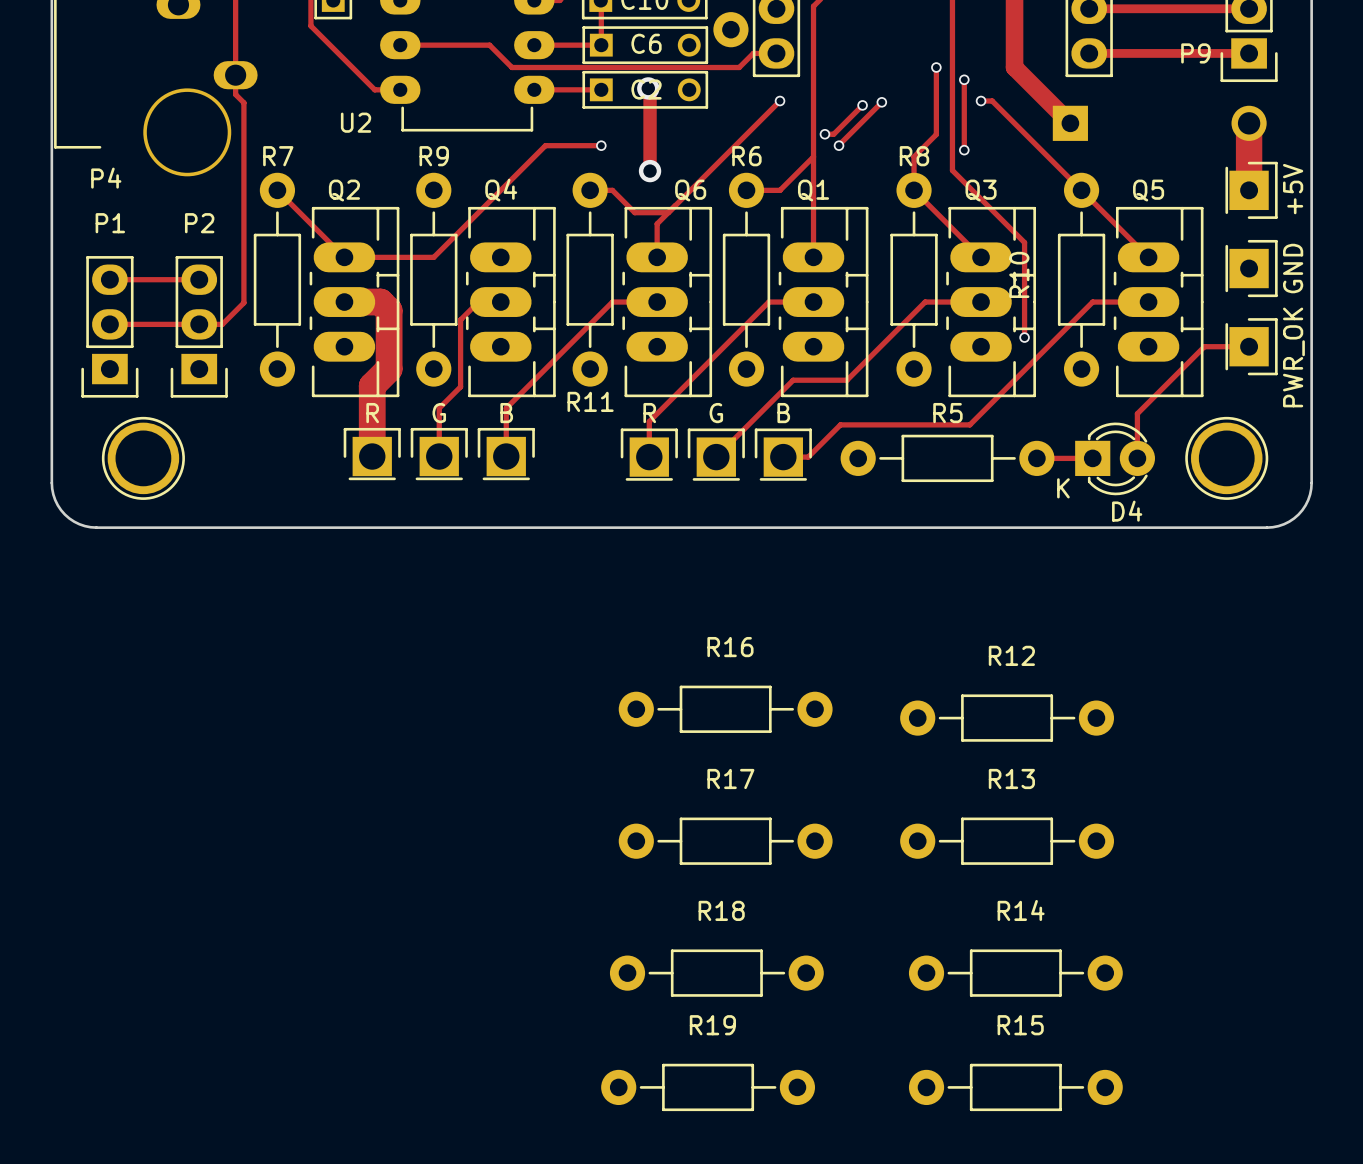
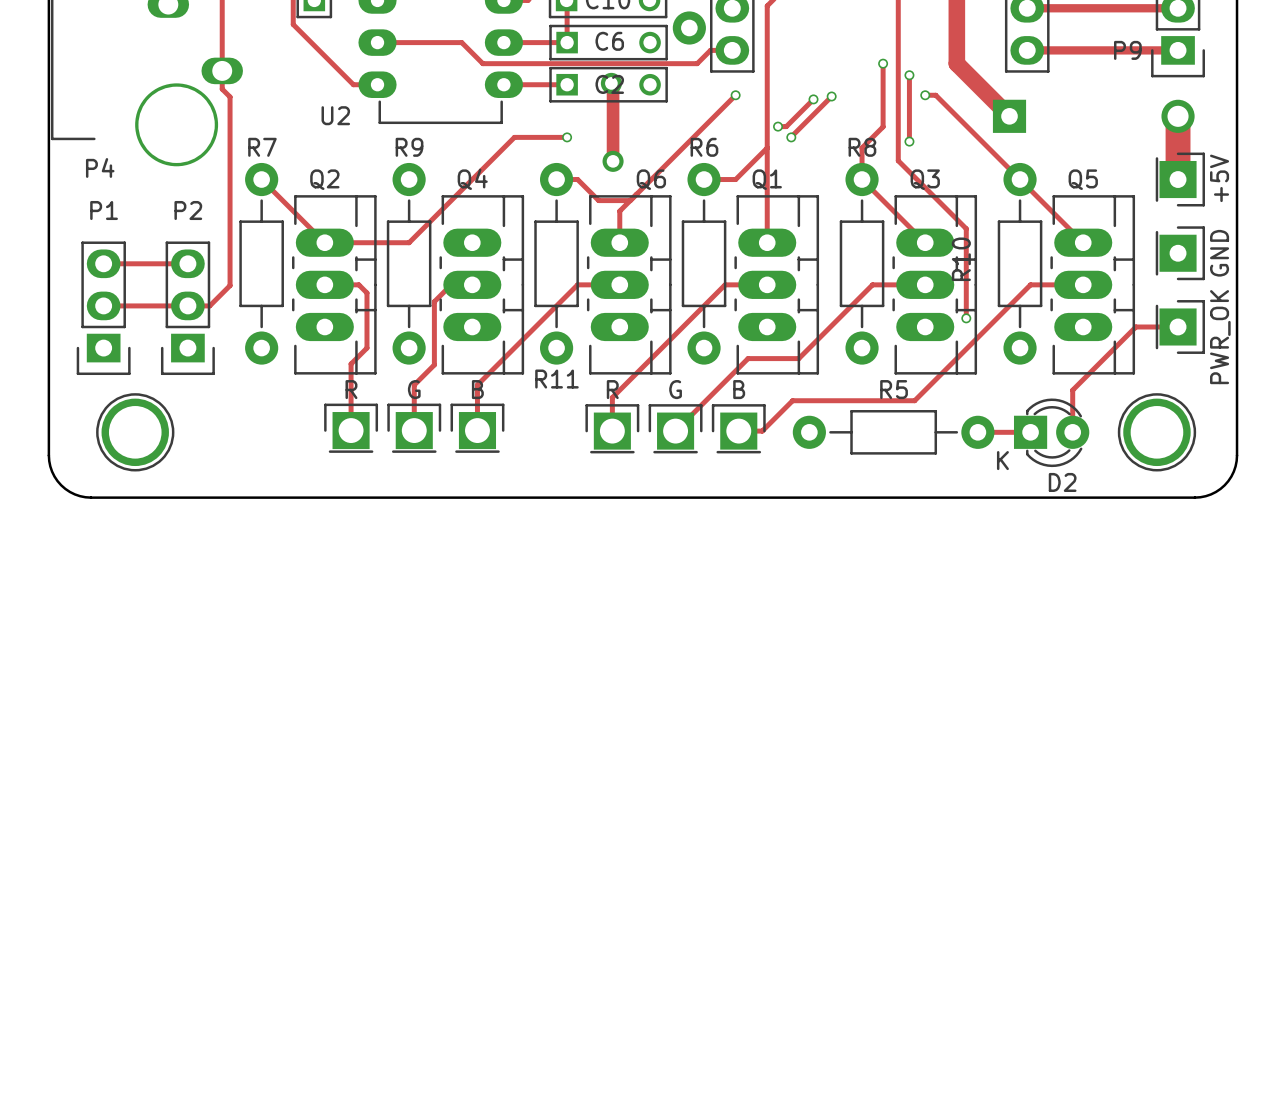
track width: thick (344, 302) (380, 302) (389, 310) (389, 369) (372, 385) (372, 456) -> thin (324, 284) (358, 284) (366, 292) (366, 348) (351, 363) (351, 430)
D4 name: D4 (1127, 511) -> D2 (1062, 482)
R16: (725, 709) -> none
R12: (1007, 718) -> none
R17: (725, 841) -> none
R13: (1007, 841) -> none
R18: (716, 973) -> none
R14: (1015, 973) -> none
R19: (708, 1087) -> none
R15: (1015, 1087) -> none

